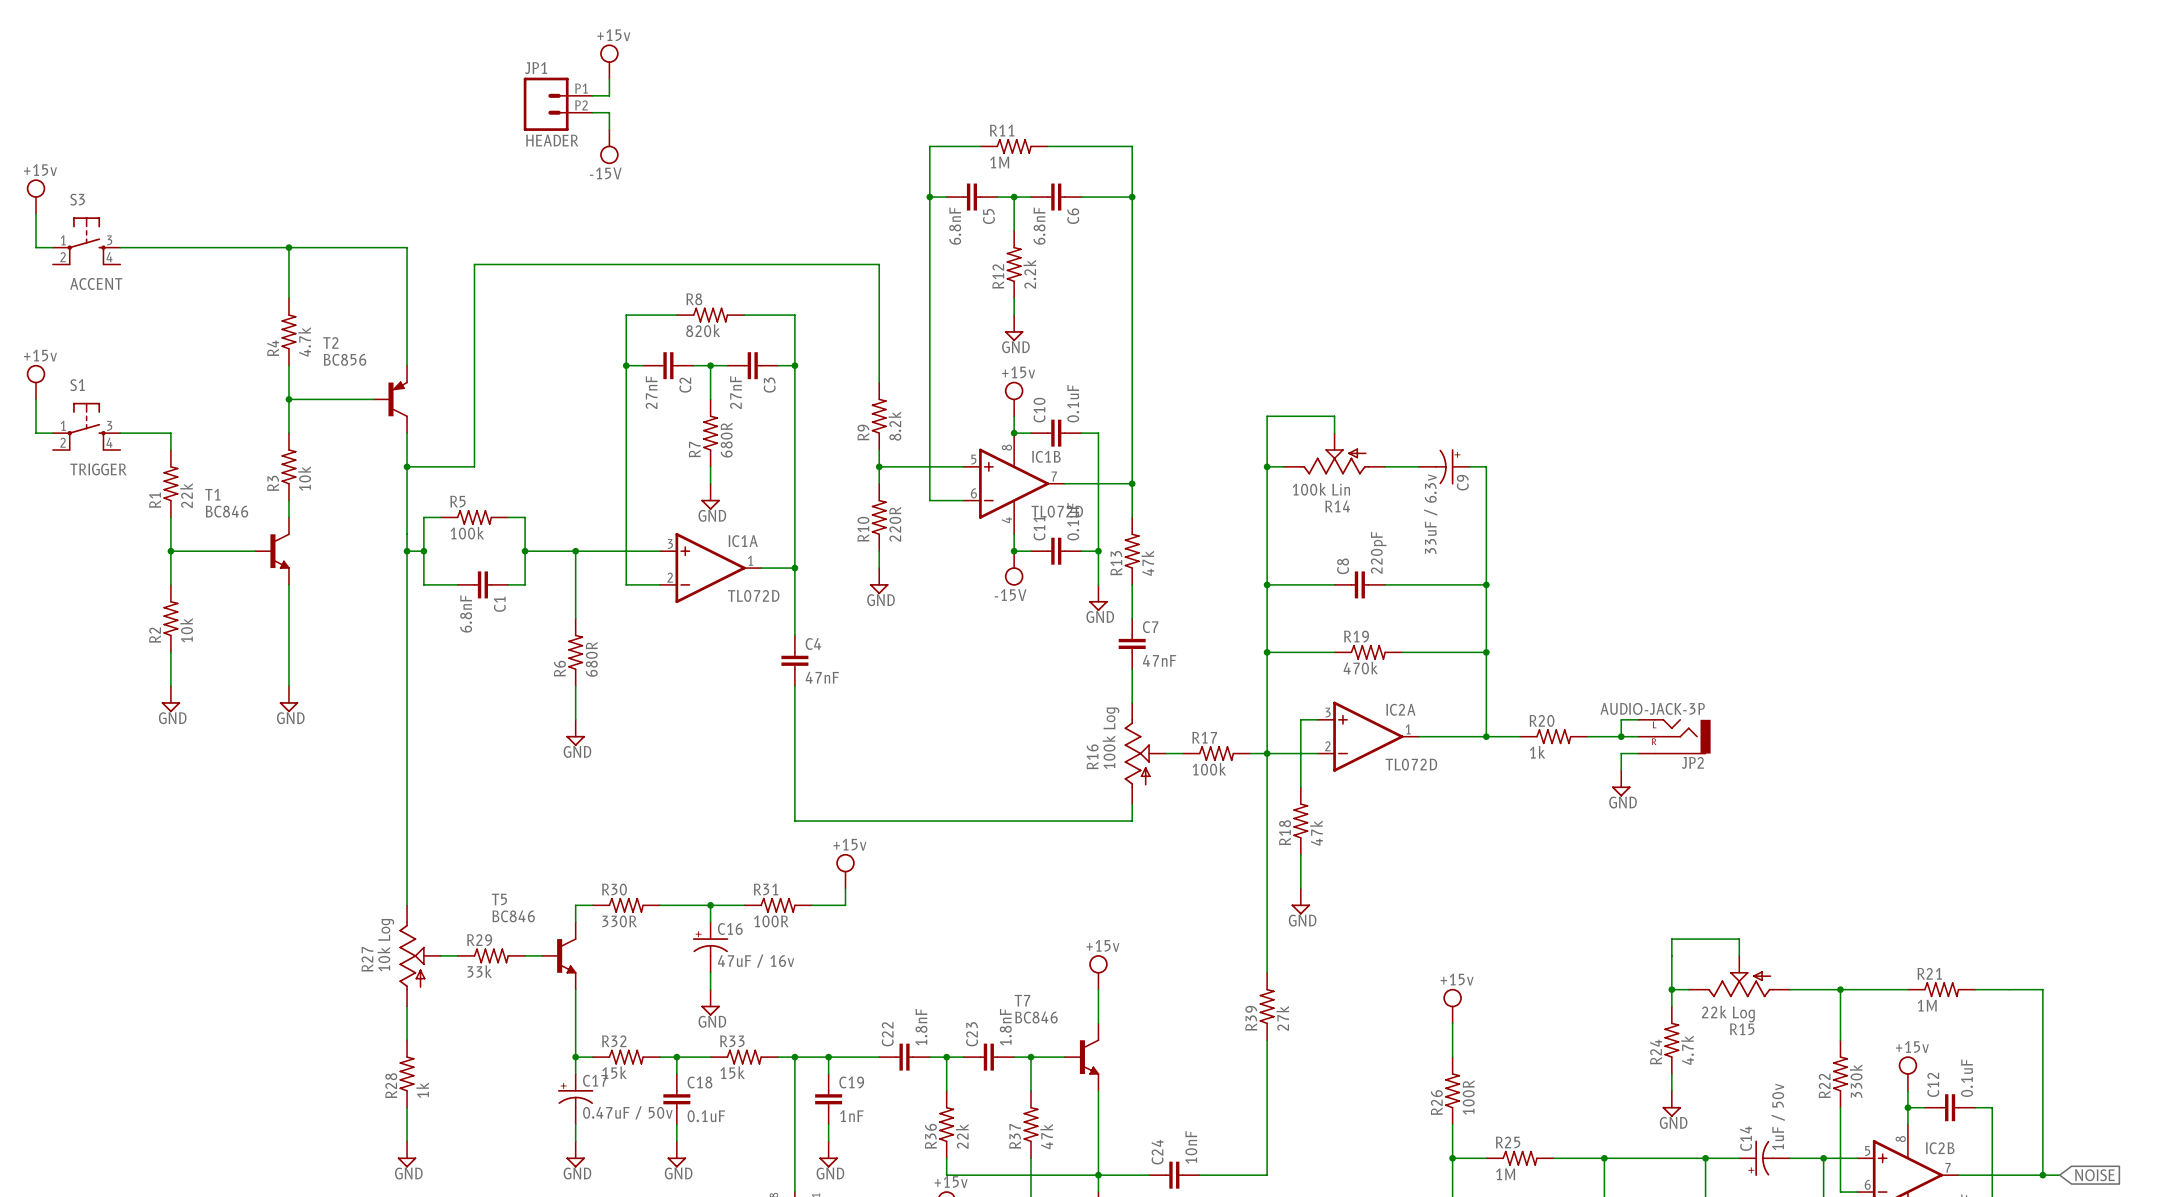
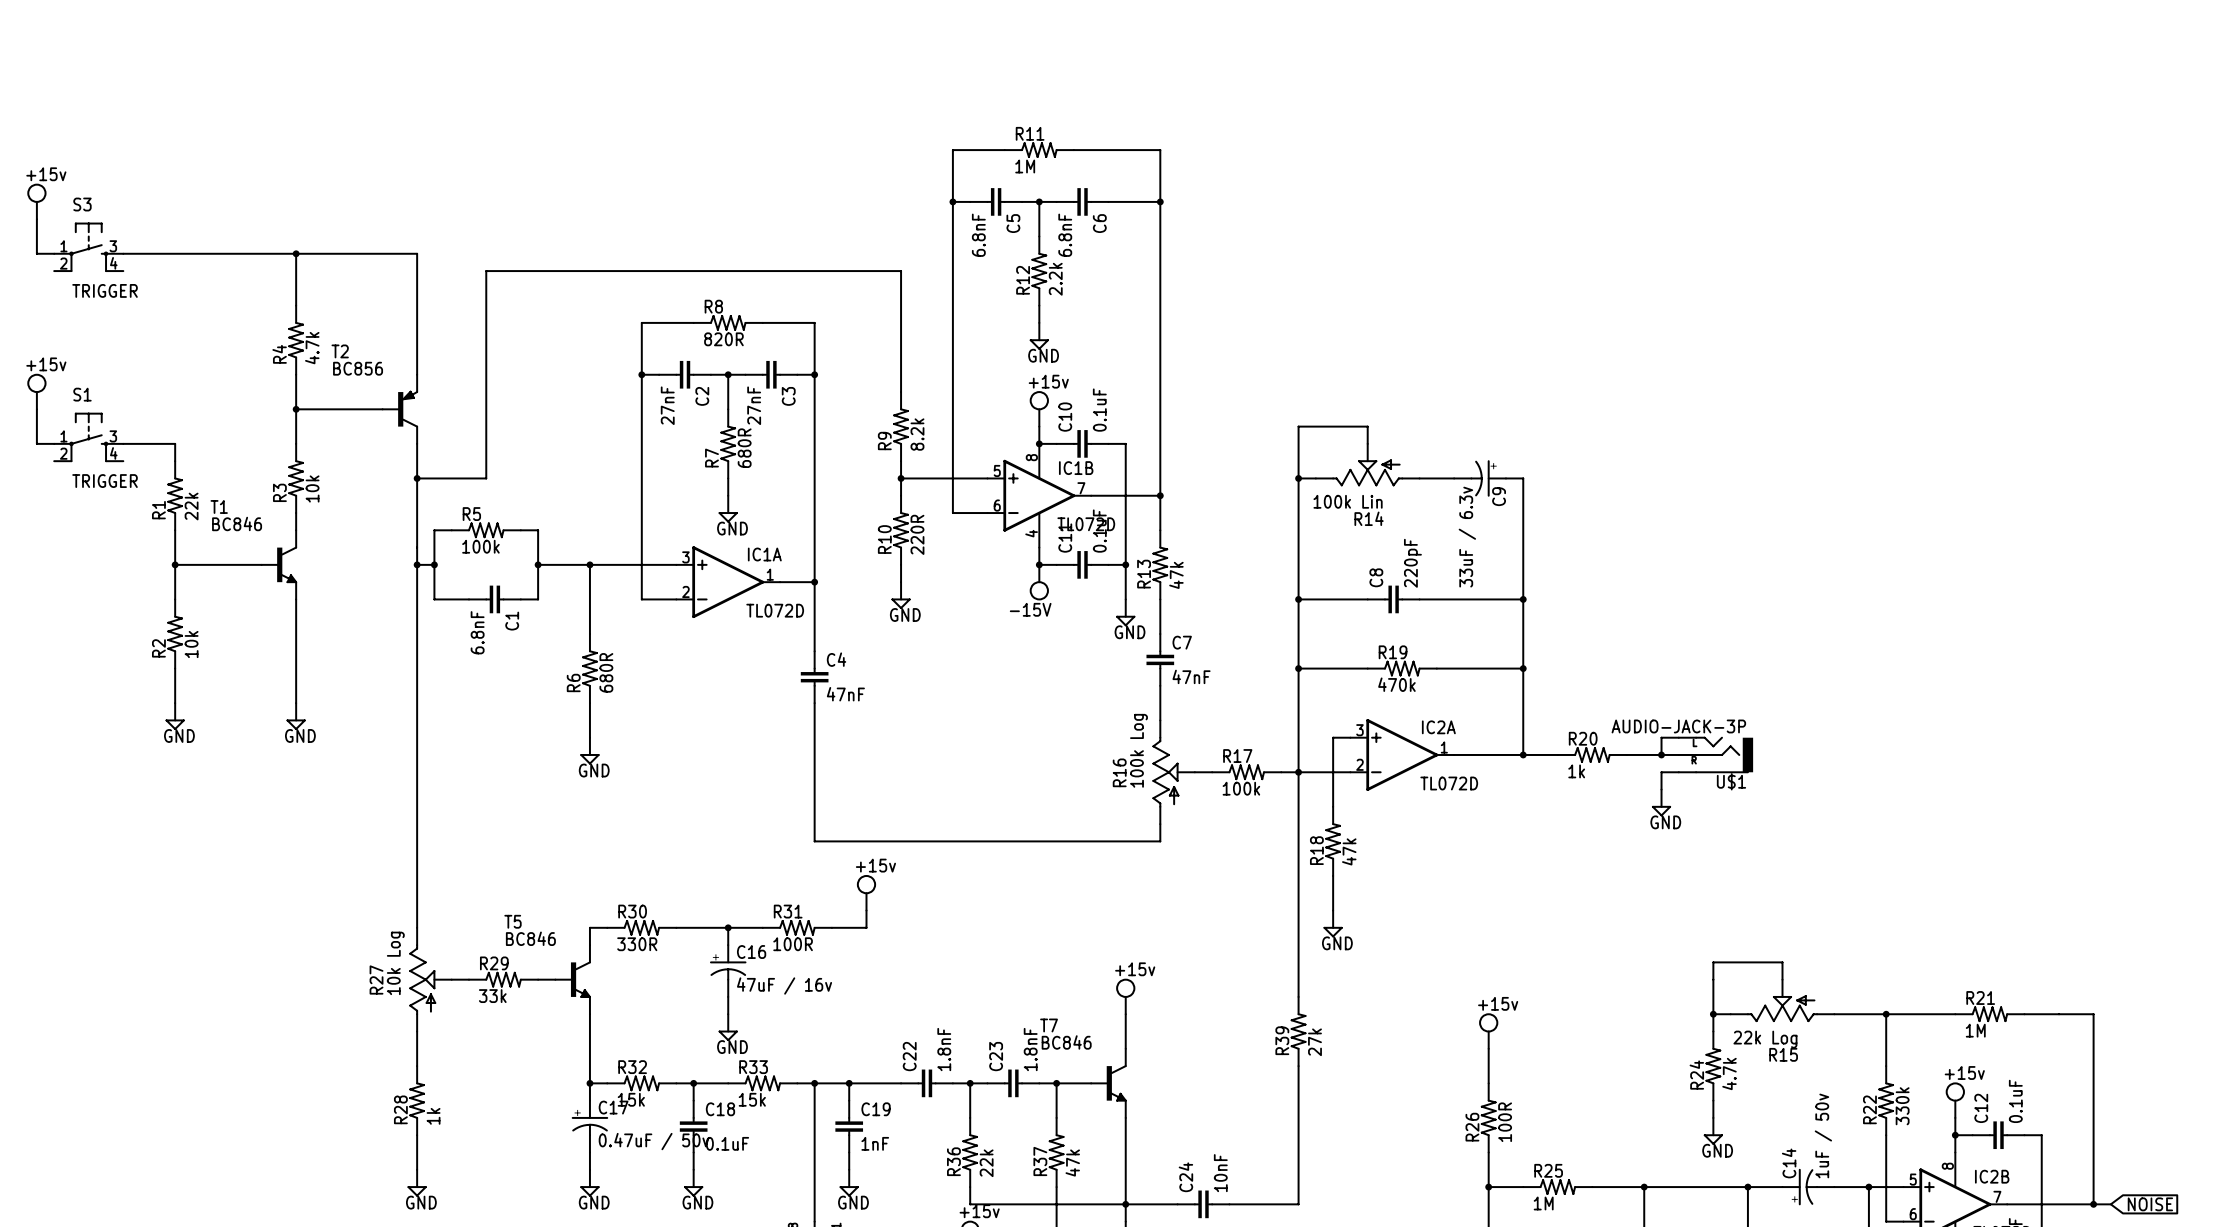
power symbol: +15v (609, 61) -> none
wire: (609, 78) (609, 95) (592, 95) -> none
JP1: HEADER (558, 104) -> none
wire: (592, 112) (609, 112) (609, 129) -> none
power symbol: -15V (609, 146) -> none
S3 value: ACCENT (96, 283) -> TRIGGER (105, 290)
R8 value: 820k (703, 330) -> 820R (723, 339)
JP2 name: JP2 (1692, 762) -> U$1 (1731, 781)

